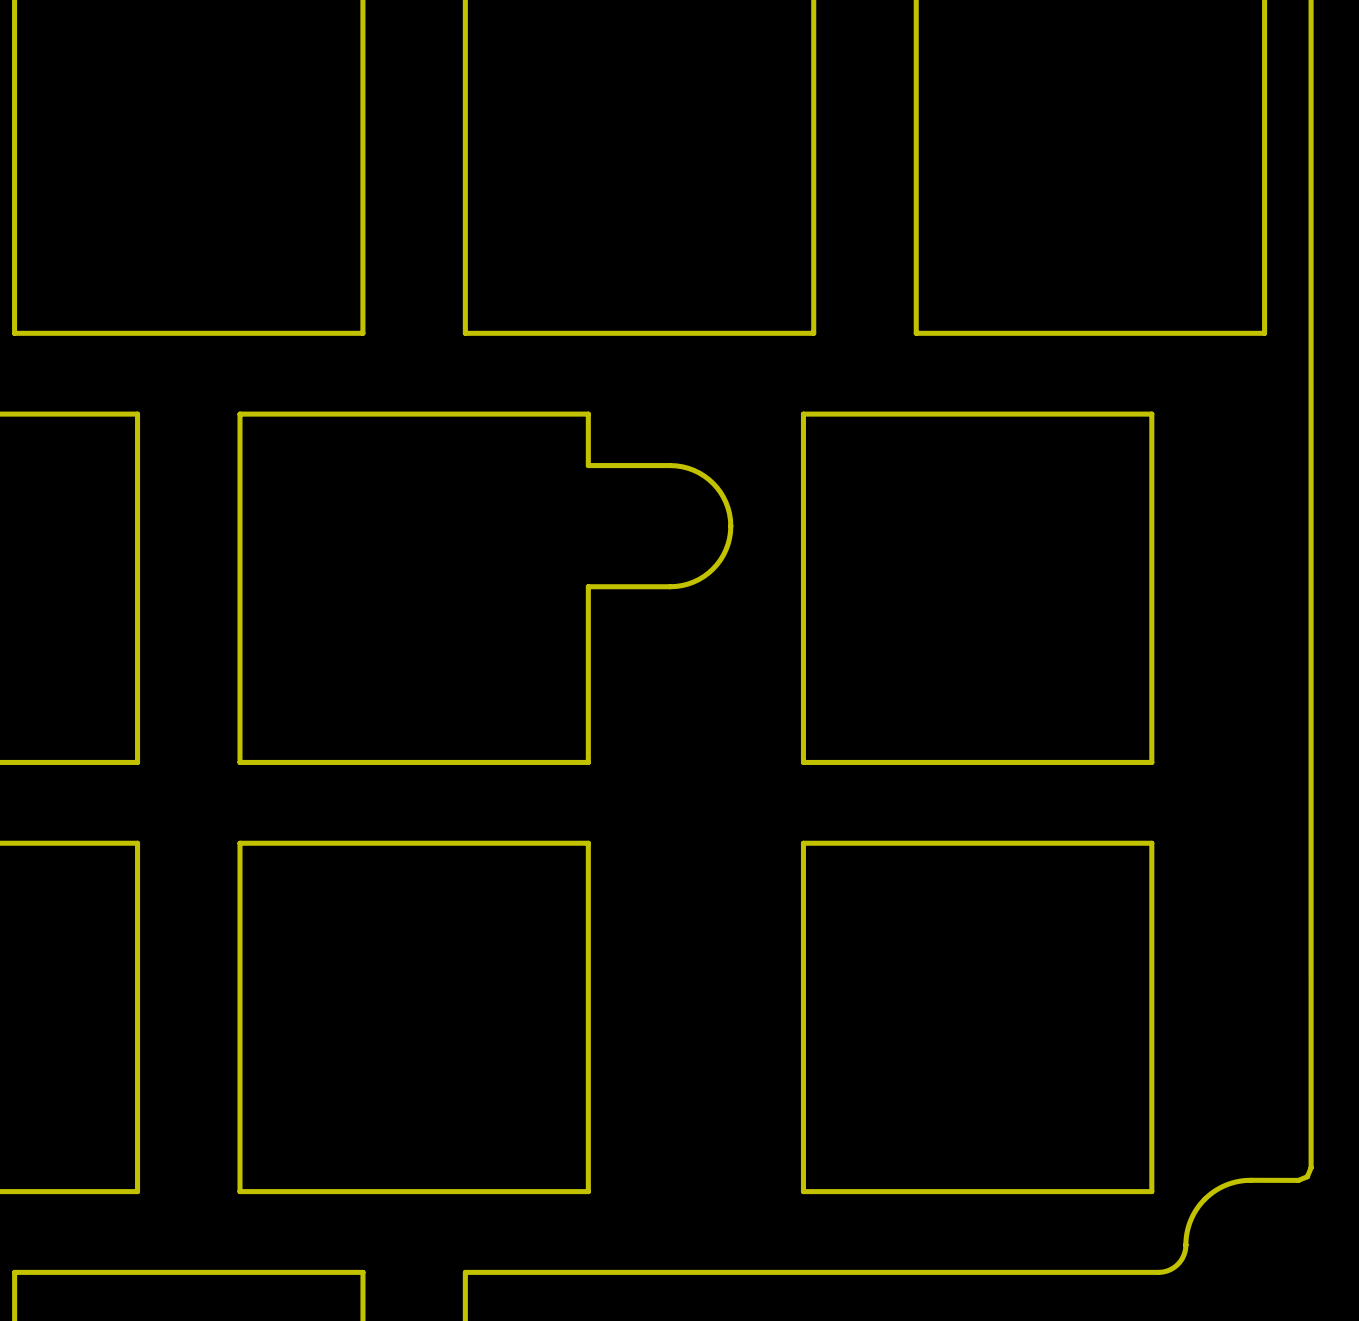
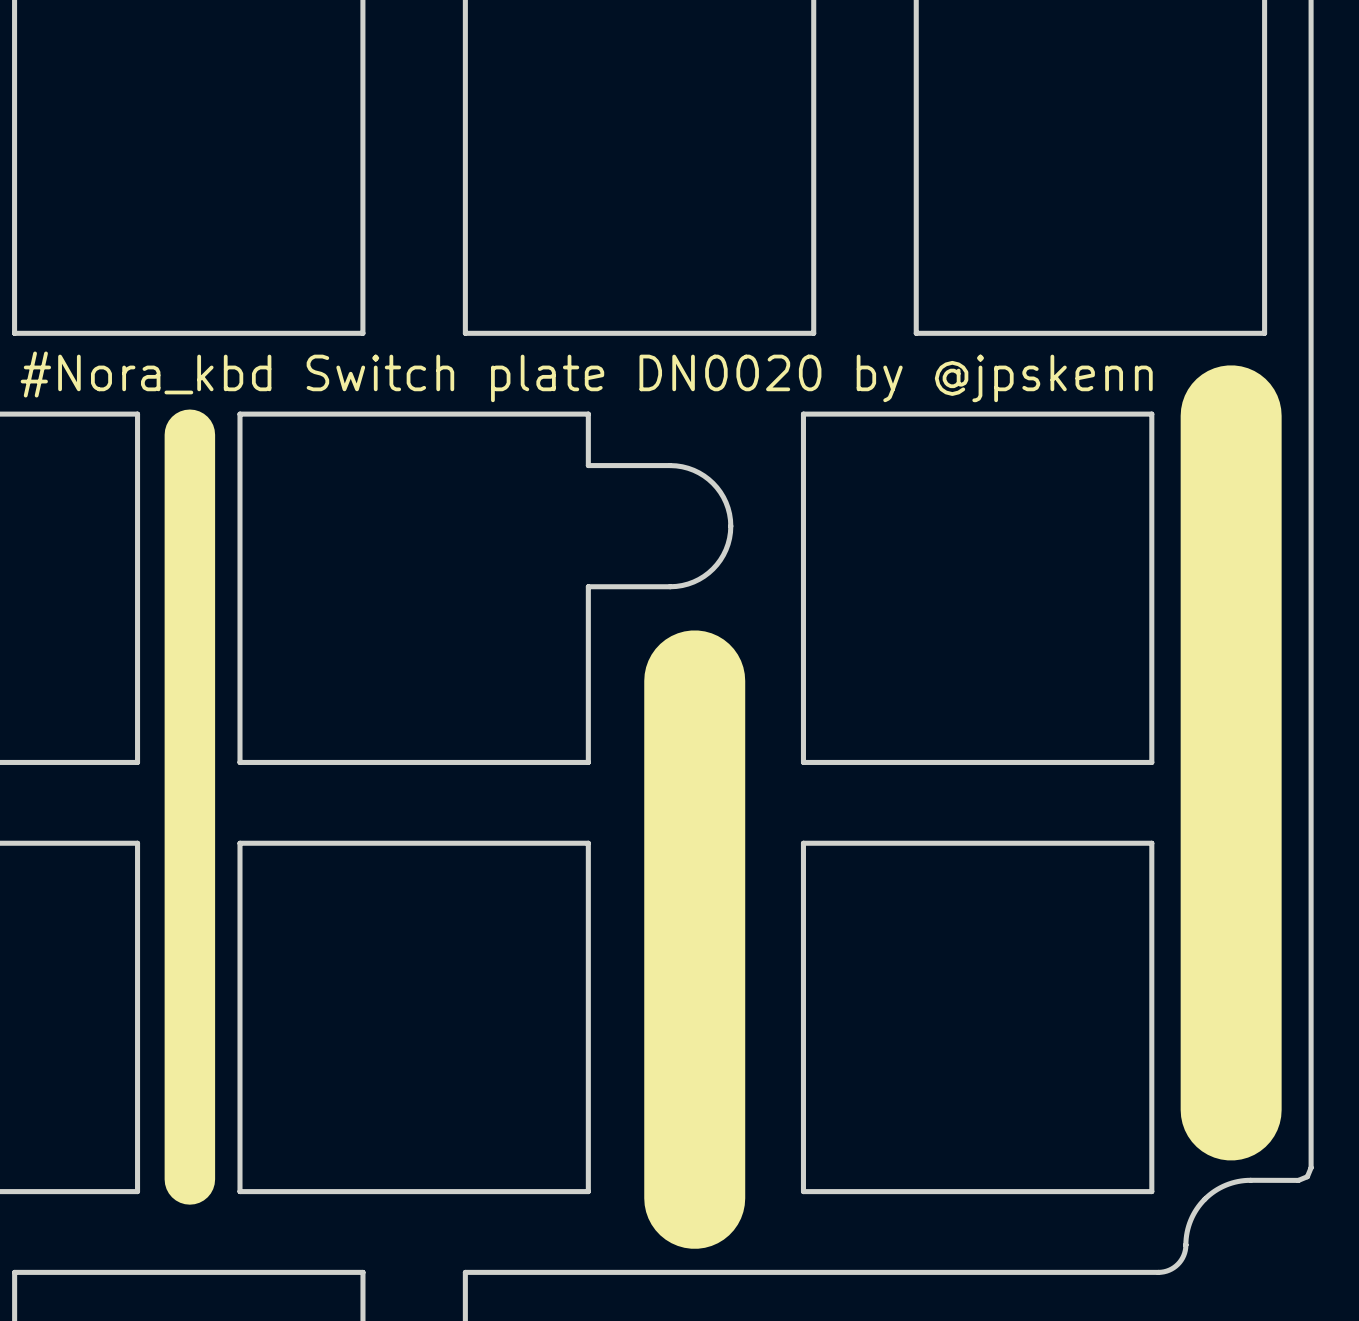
text: none -> #Nora_kbd Switch plate DN0020 by @jpskenn (586, 376)
line: none -> (1231, 415) (1231, 1110)
line: none -> (189, 434) (189, 1179)
line: none -> (694, 680) (694, 1198)

